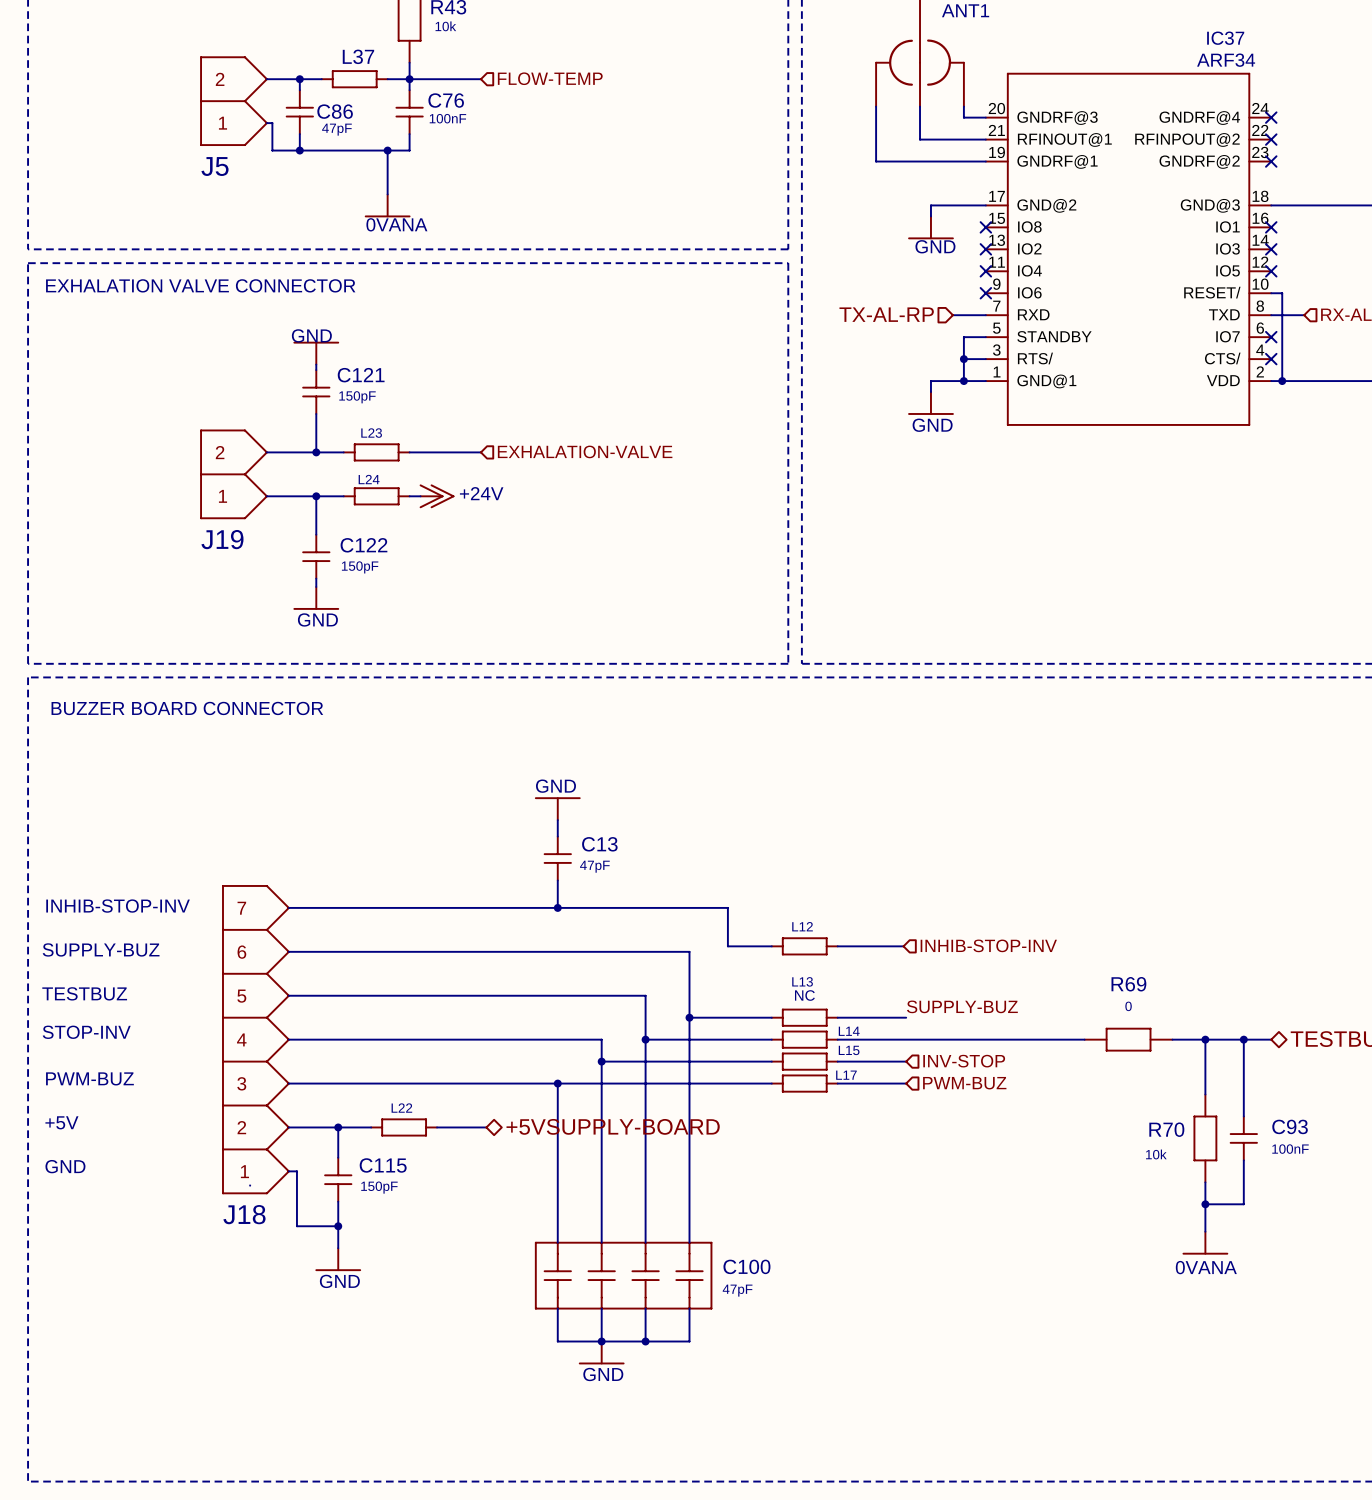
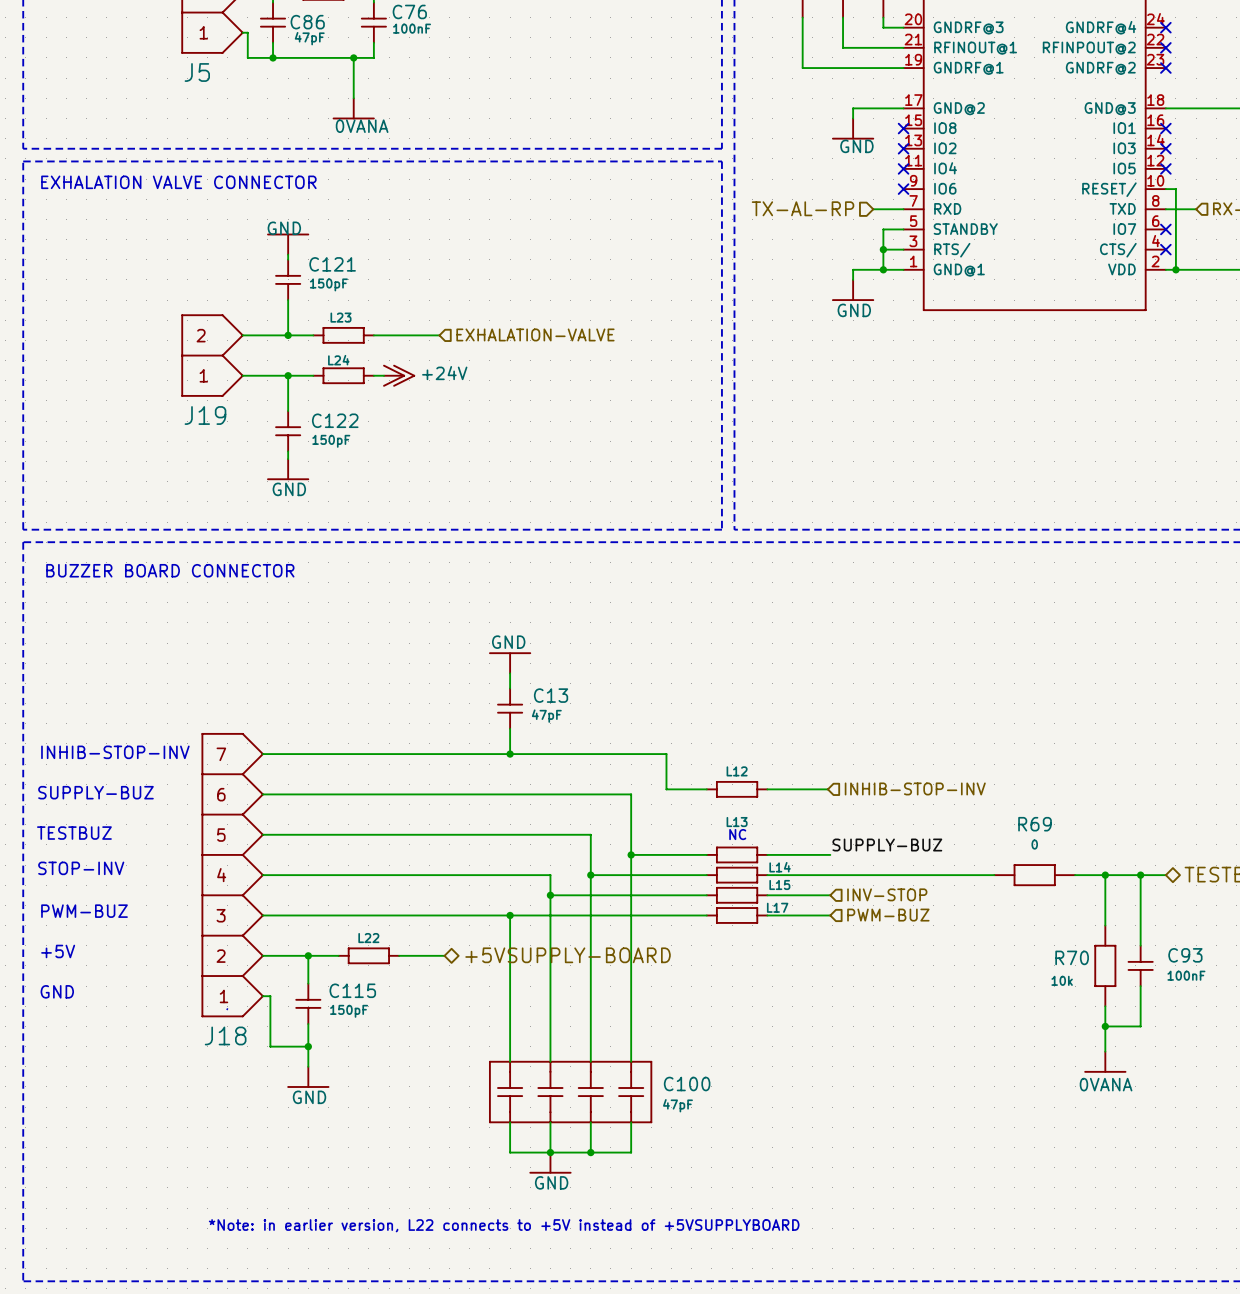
text: none -> *Note: in earlier version, L22 connects to +5V instead of +5VSUPPLYBOARD (504, 1225)

